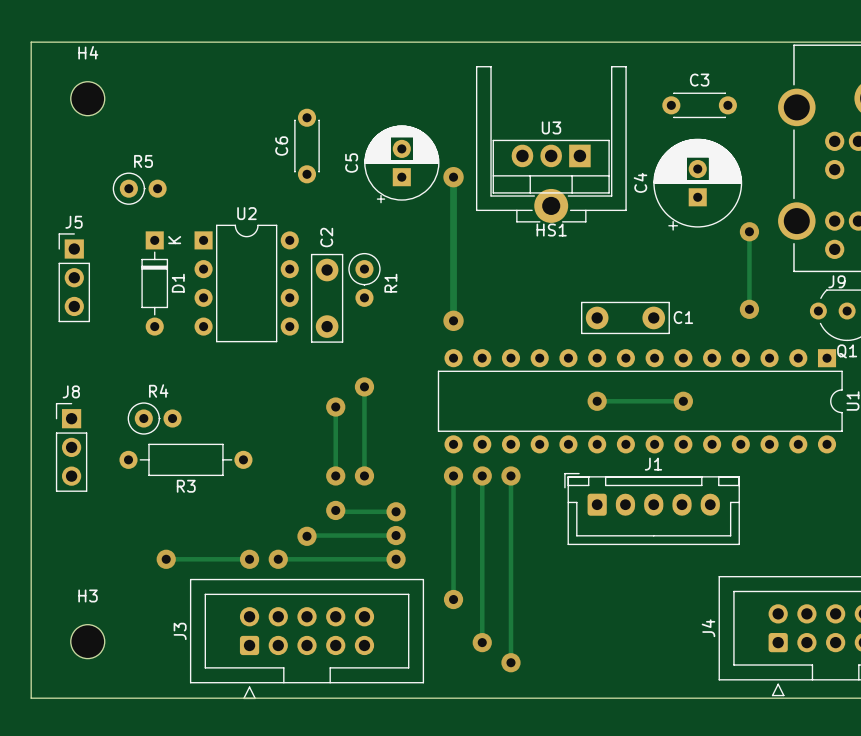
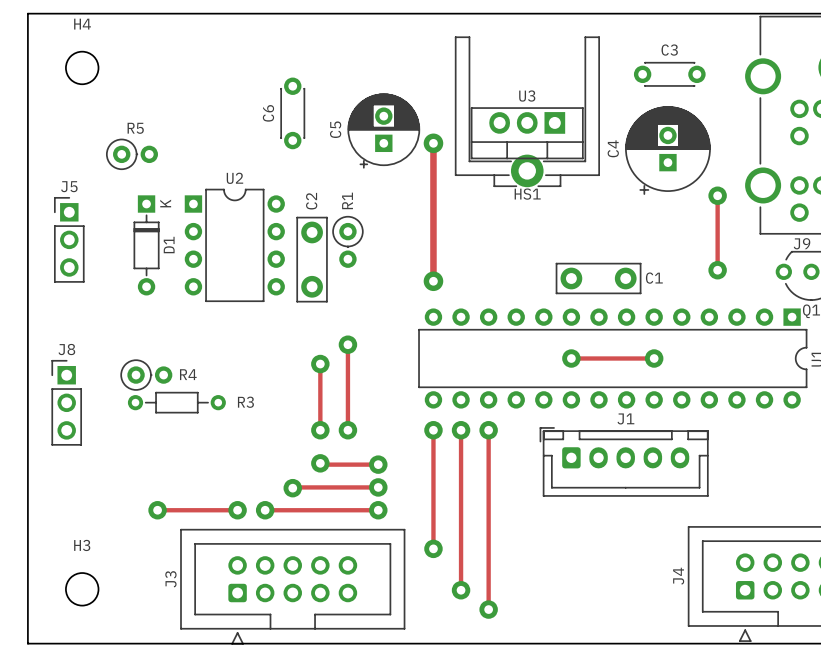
R1 name position: R1 (390, 283) -> R1 (347, 200)
R4 name position: R4 (158, 391) -> R4 (188, 374)
R3 footprint: [119, 443, 253, 477] -> [127, 392, 226, 414]
R3 name position: R3 (186, 486) -> R3 (245, 402)

